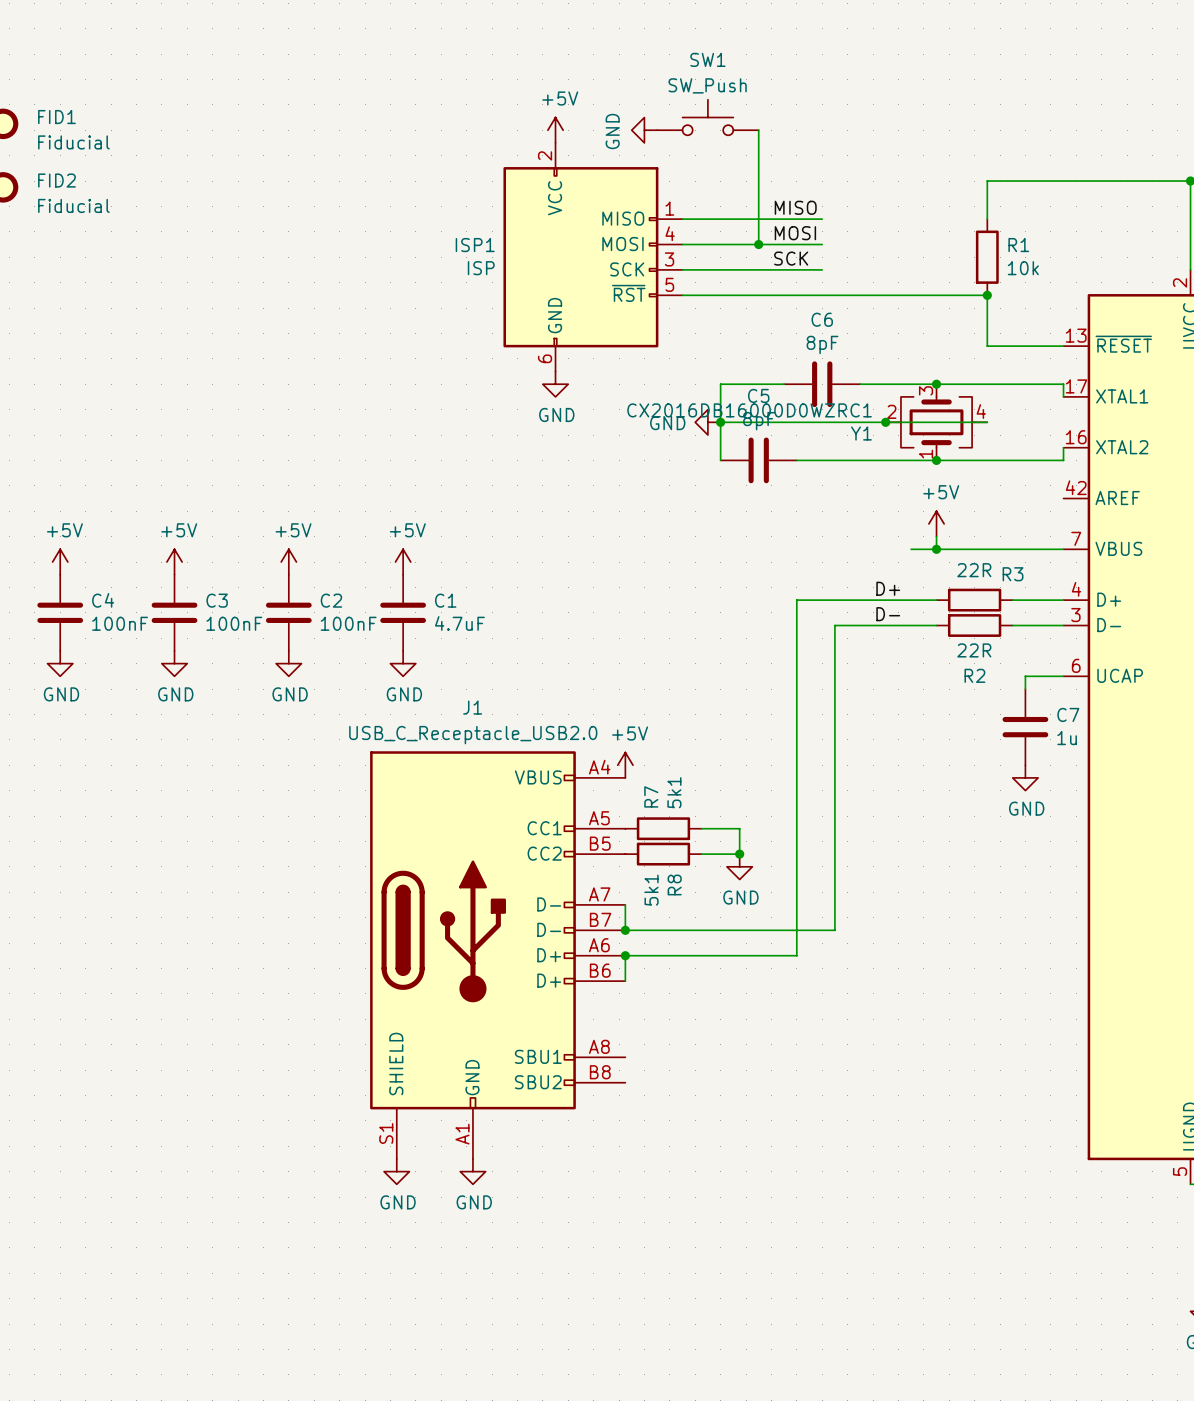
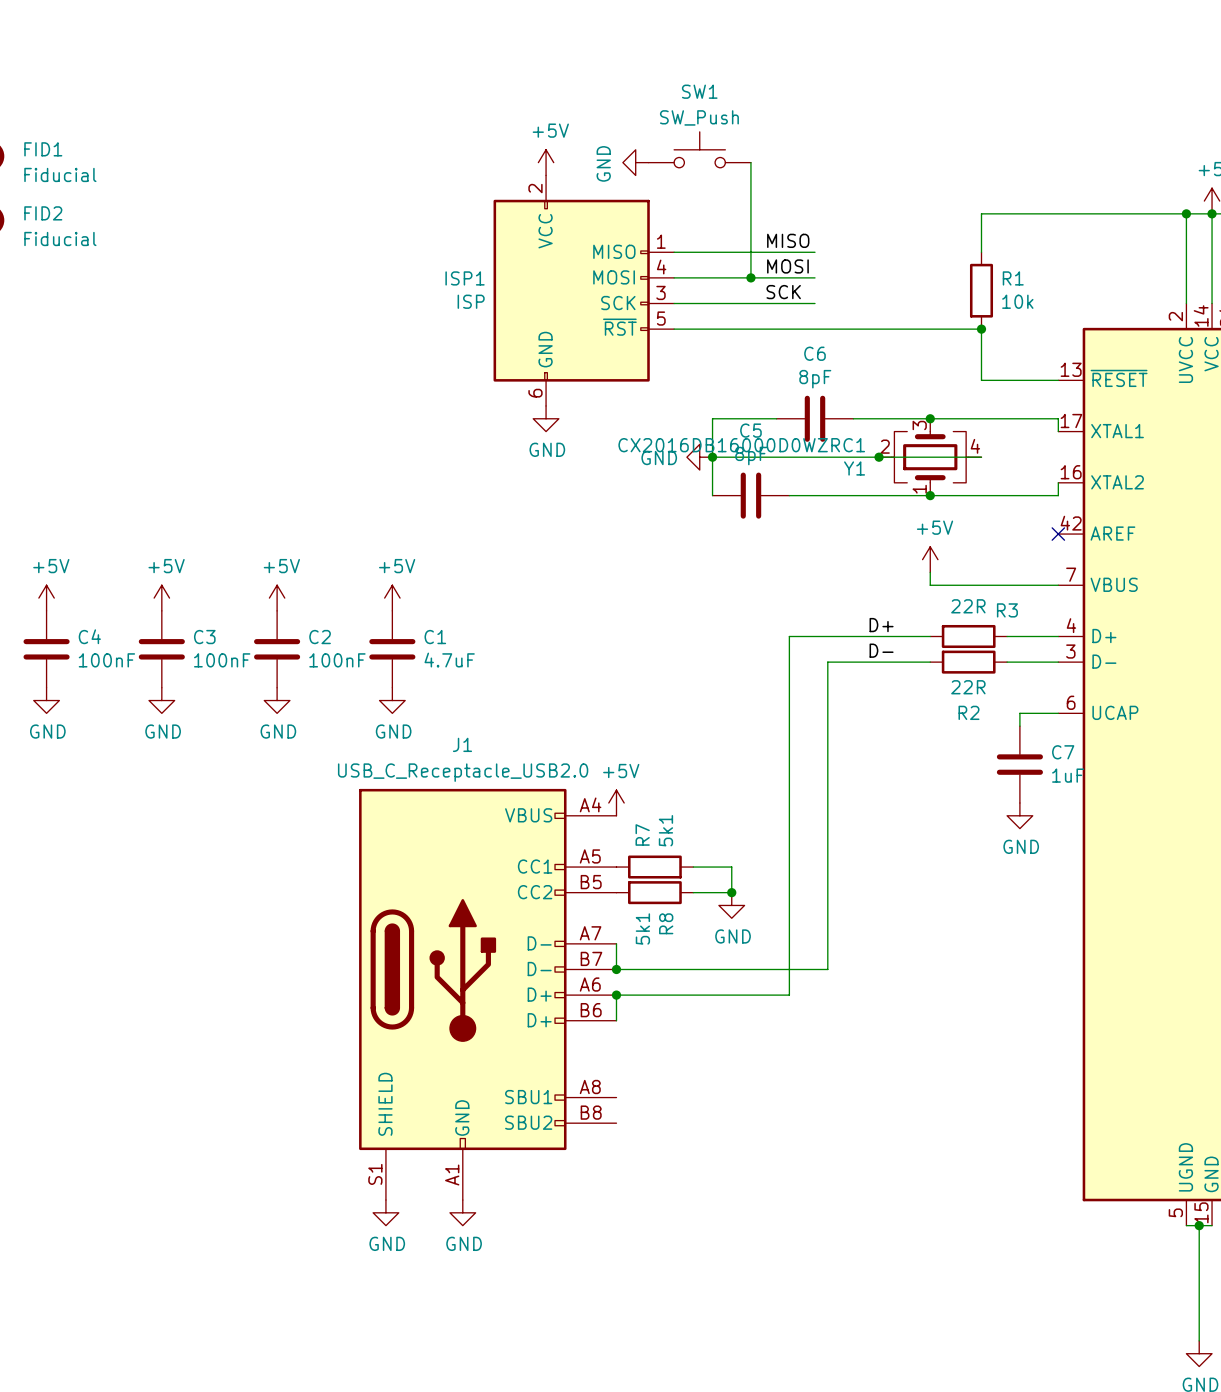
no-connect mark: none -> (1058, 534)
wire: (911, 549) (936, 549) -> none
junction: (936, 549) -> none
C7 value: 1u (1067, 738) -> 1uF (1068, 775)

